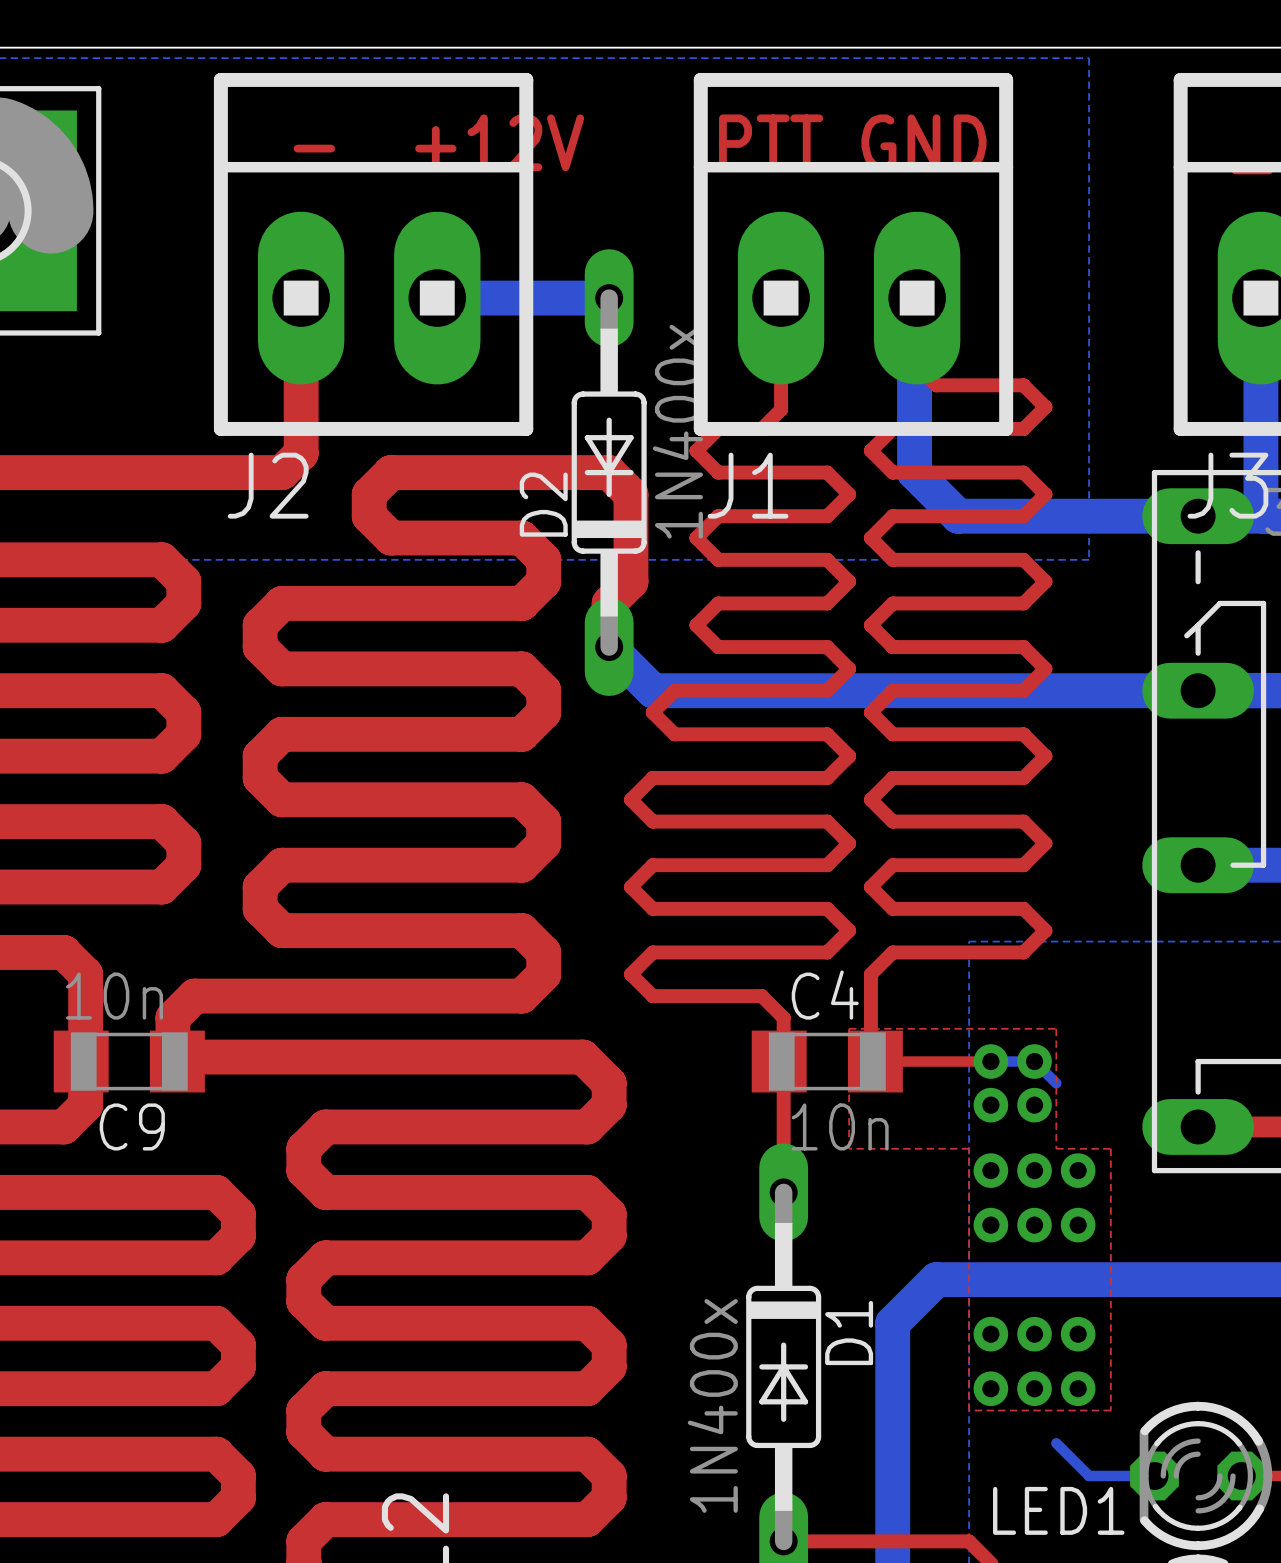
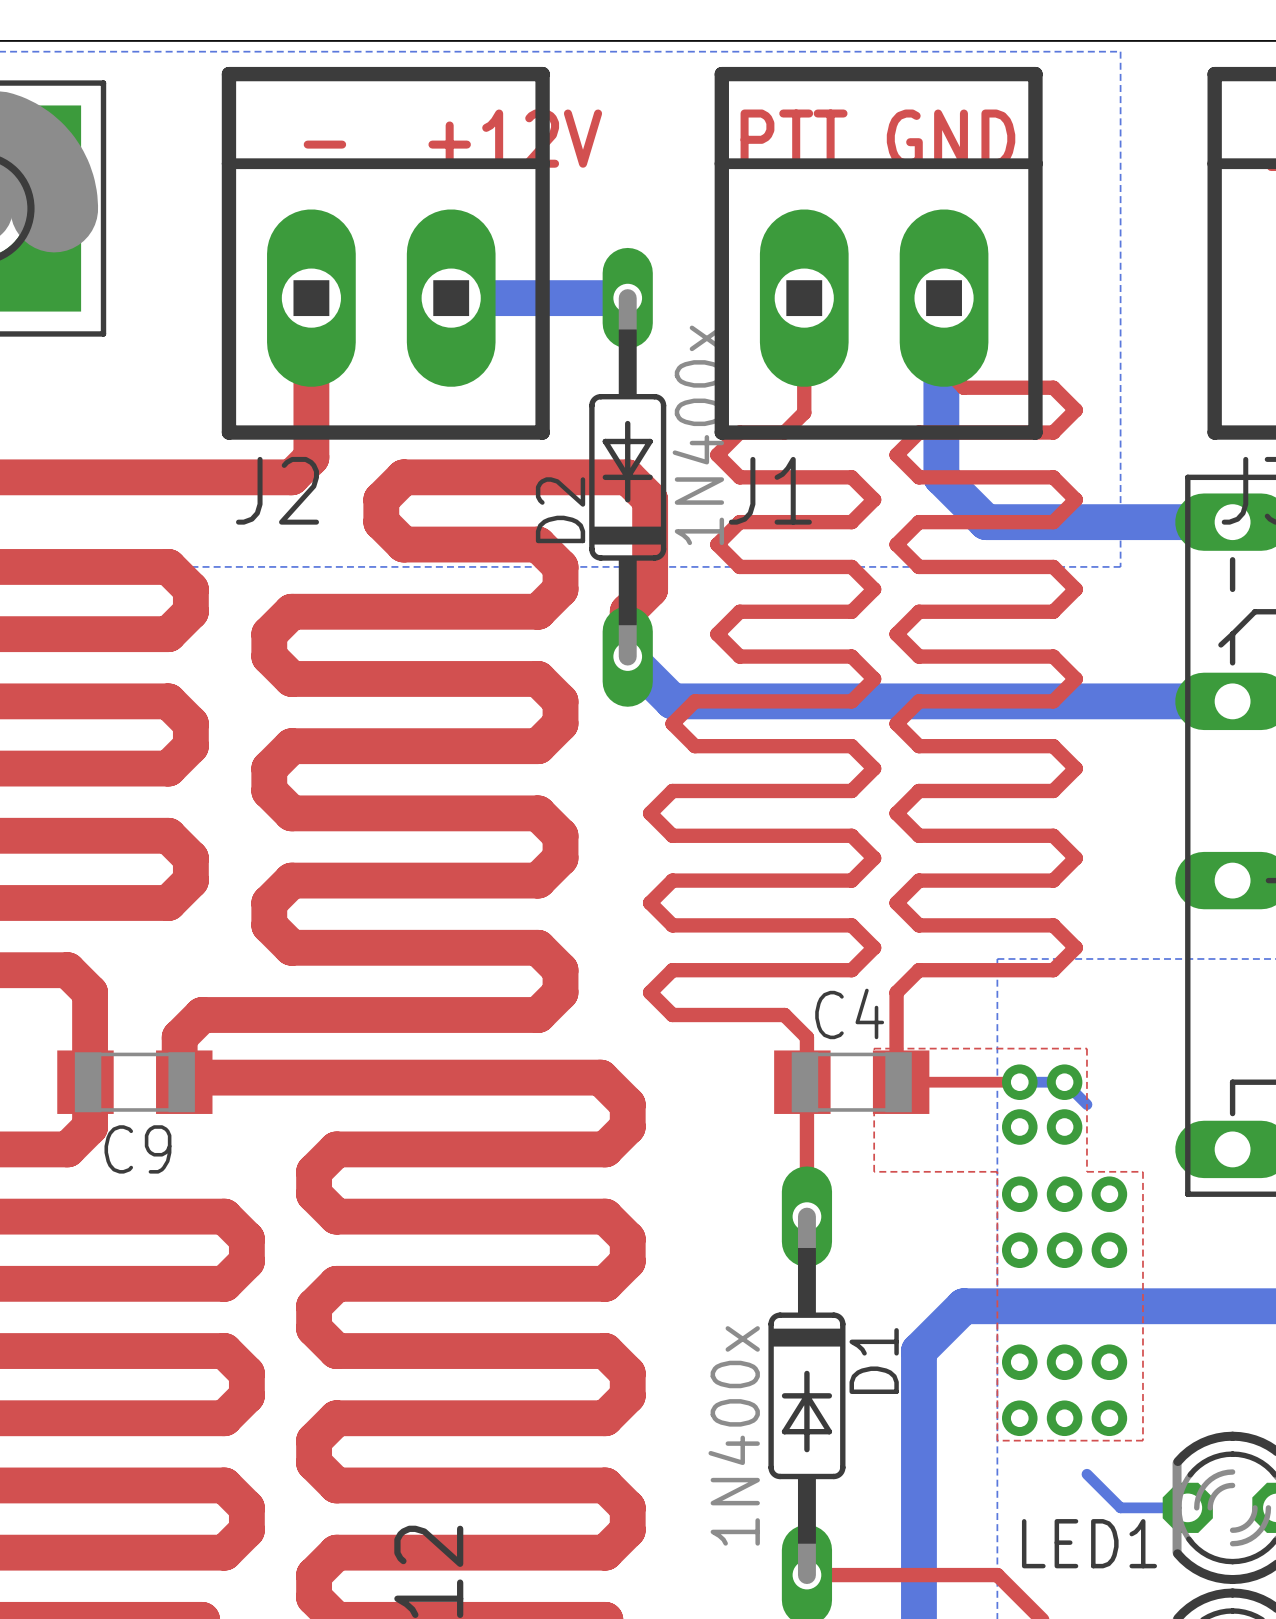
C9 value: 10n (114, 996) -> none
C4 value: 10n (840, 1126) -> none

